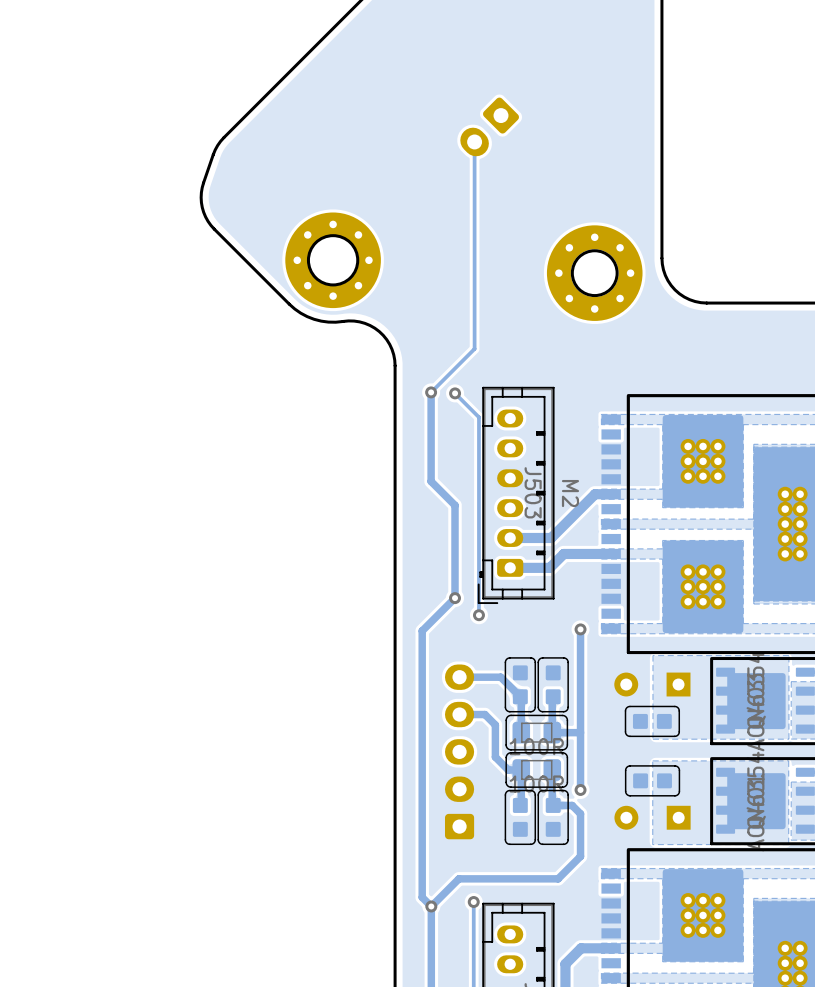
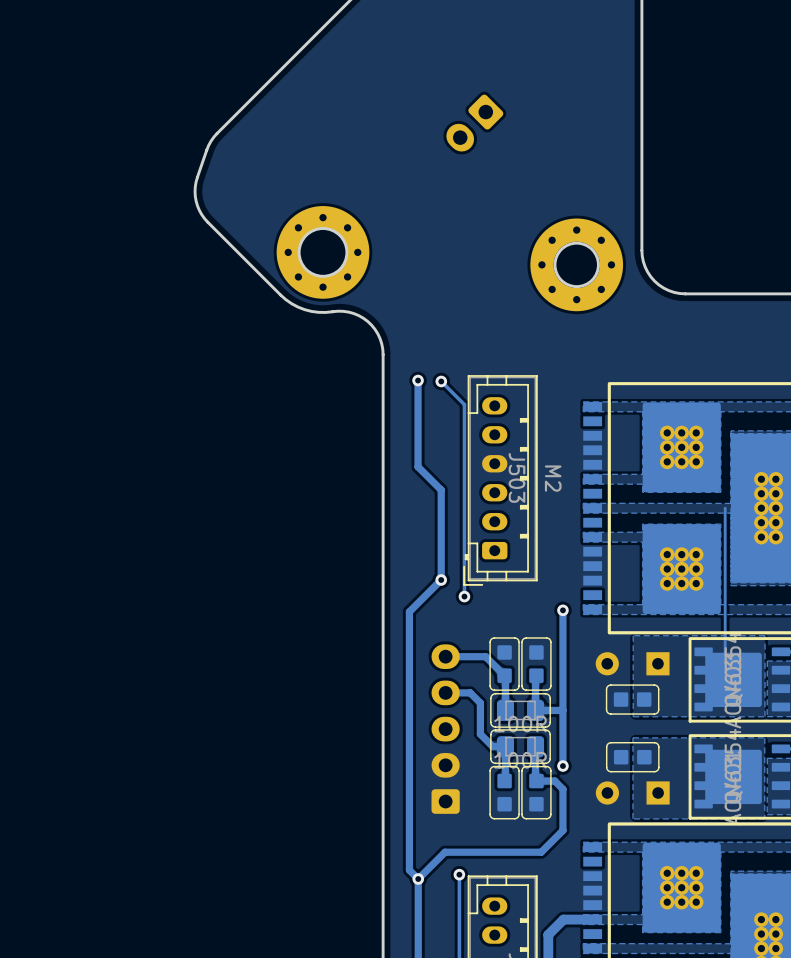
track: (474, 141) (474, 348) (431, 392) -> none
track: (611, 494) (595, 494) (551, 537) (510, 537) -> none
track: none -> (725, 508) (725, 682)
track: (611, 553) (563, 553) (549, 567) (510, 567) -> none

